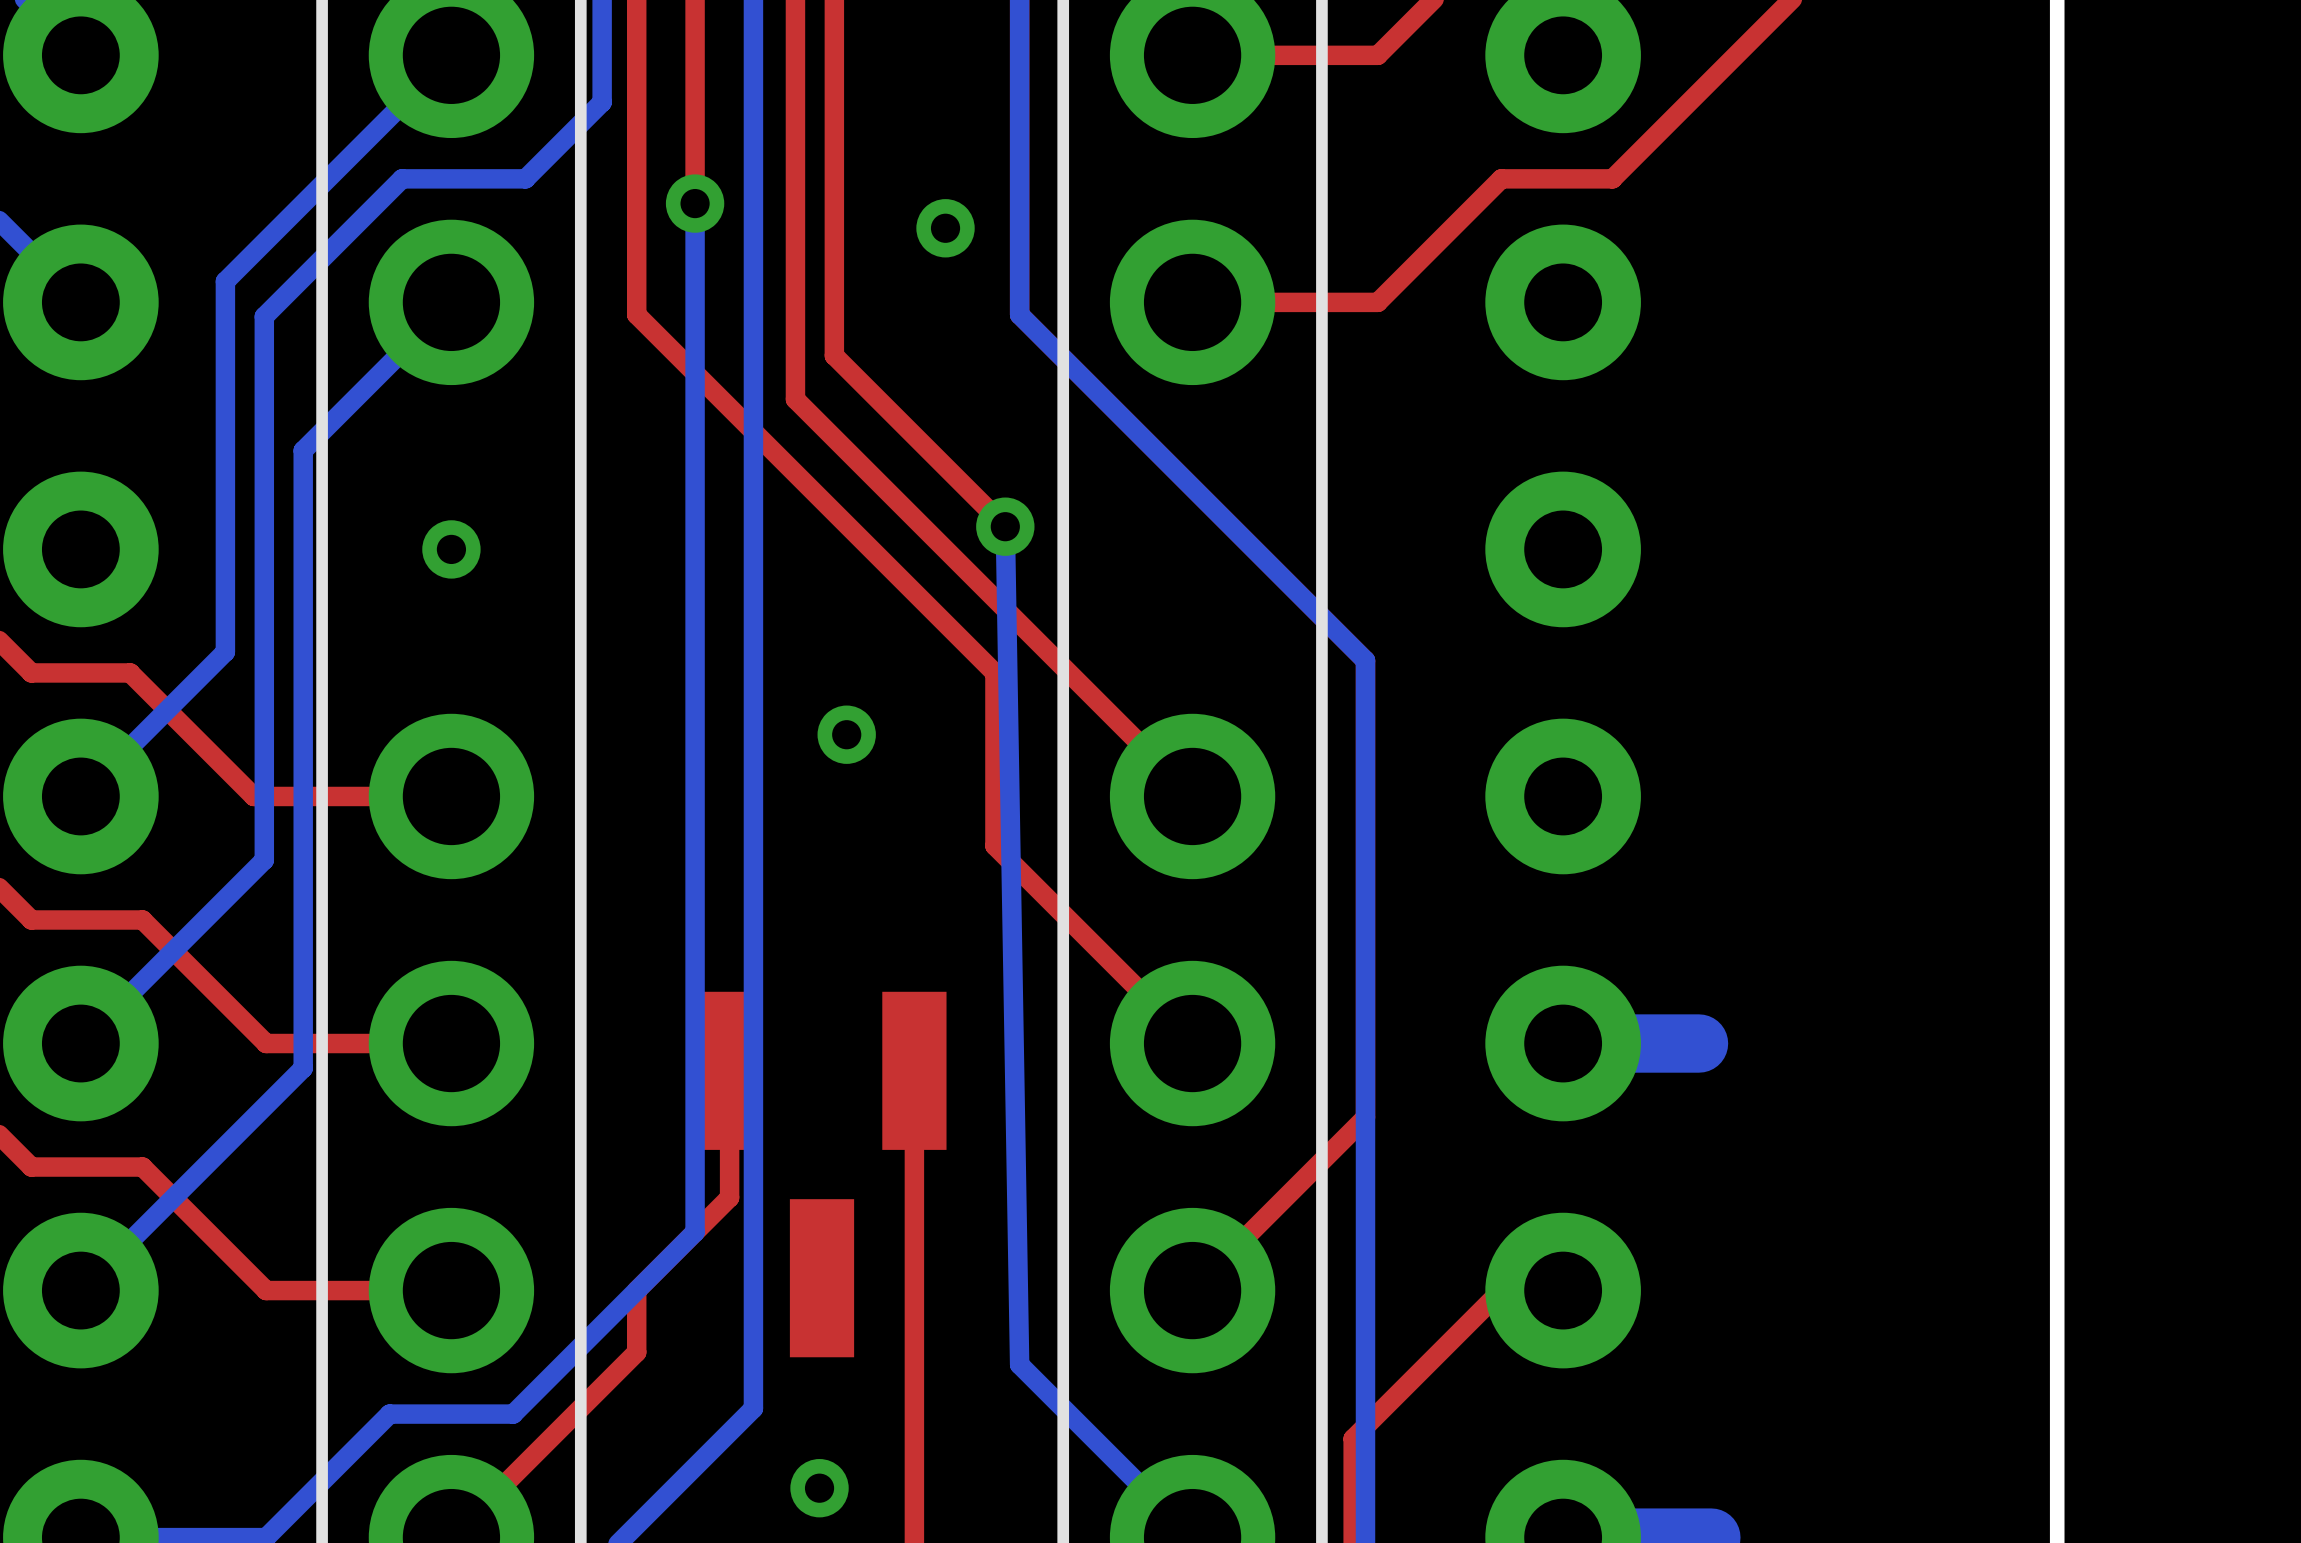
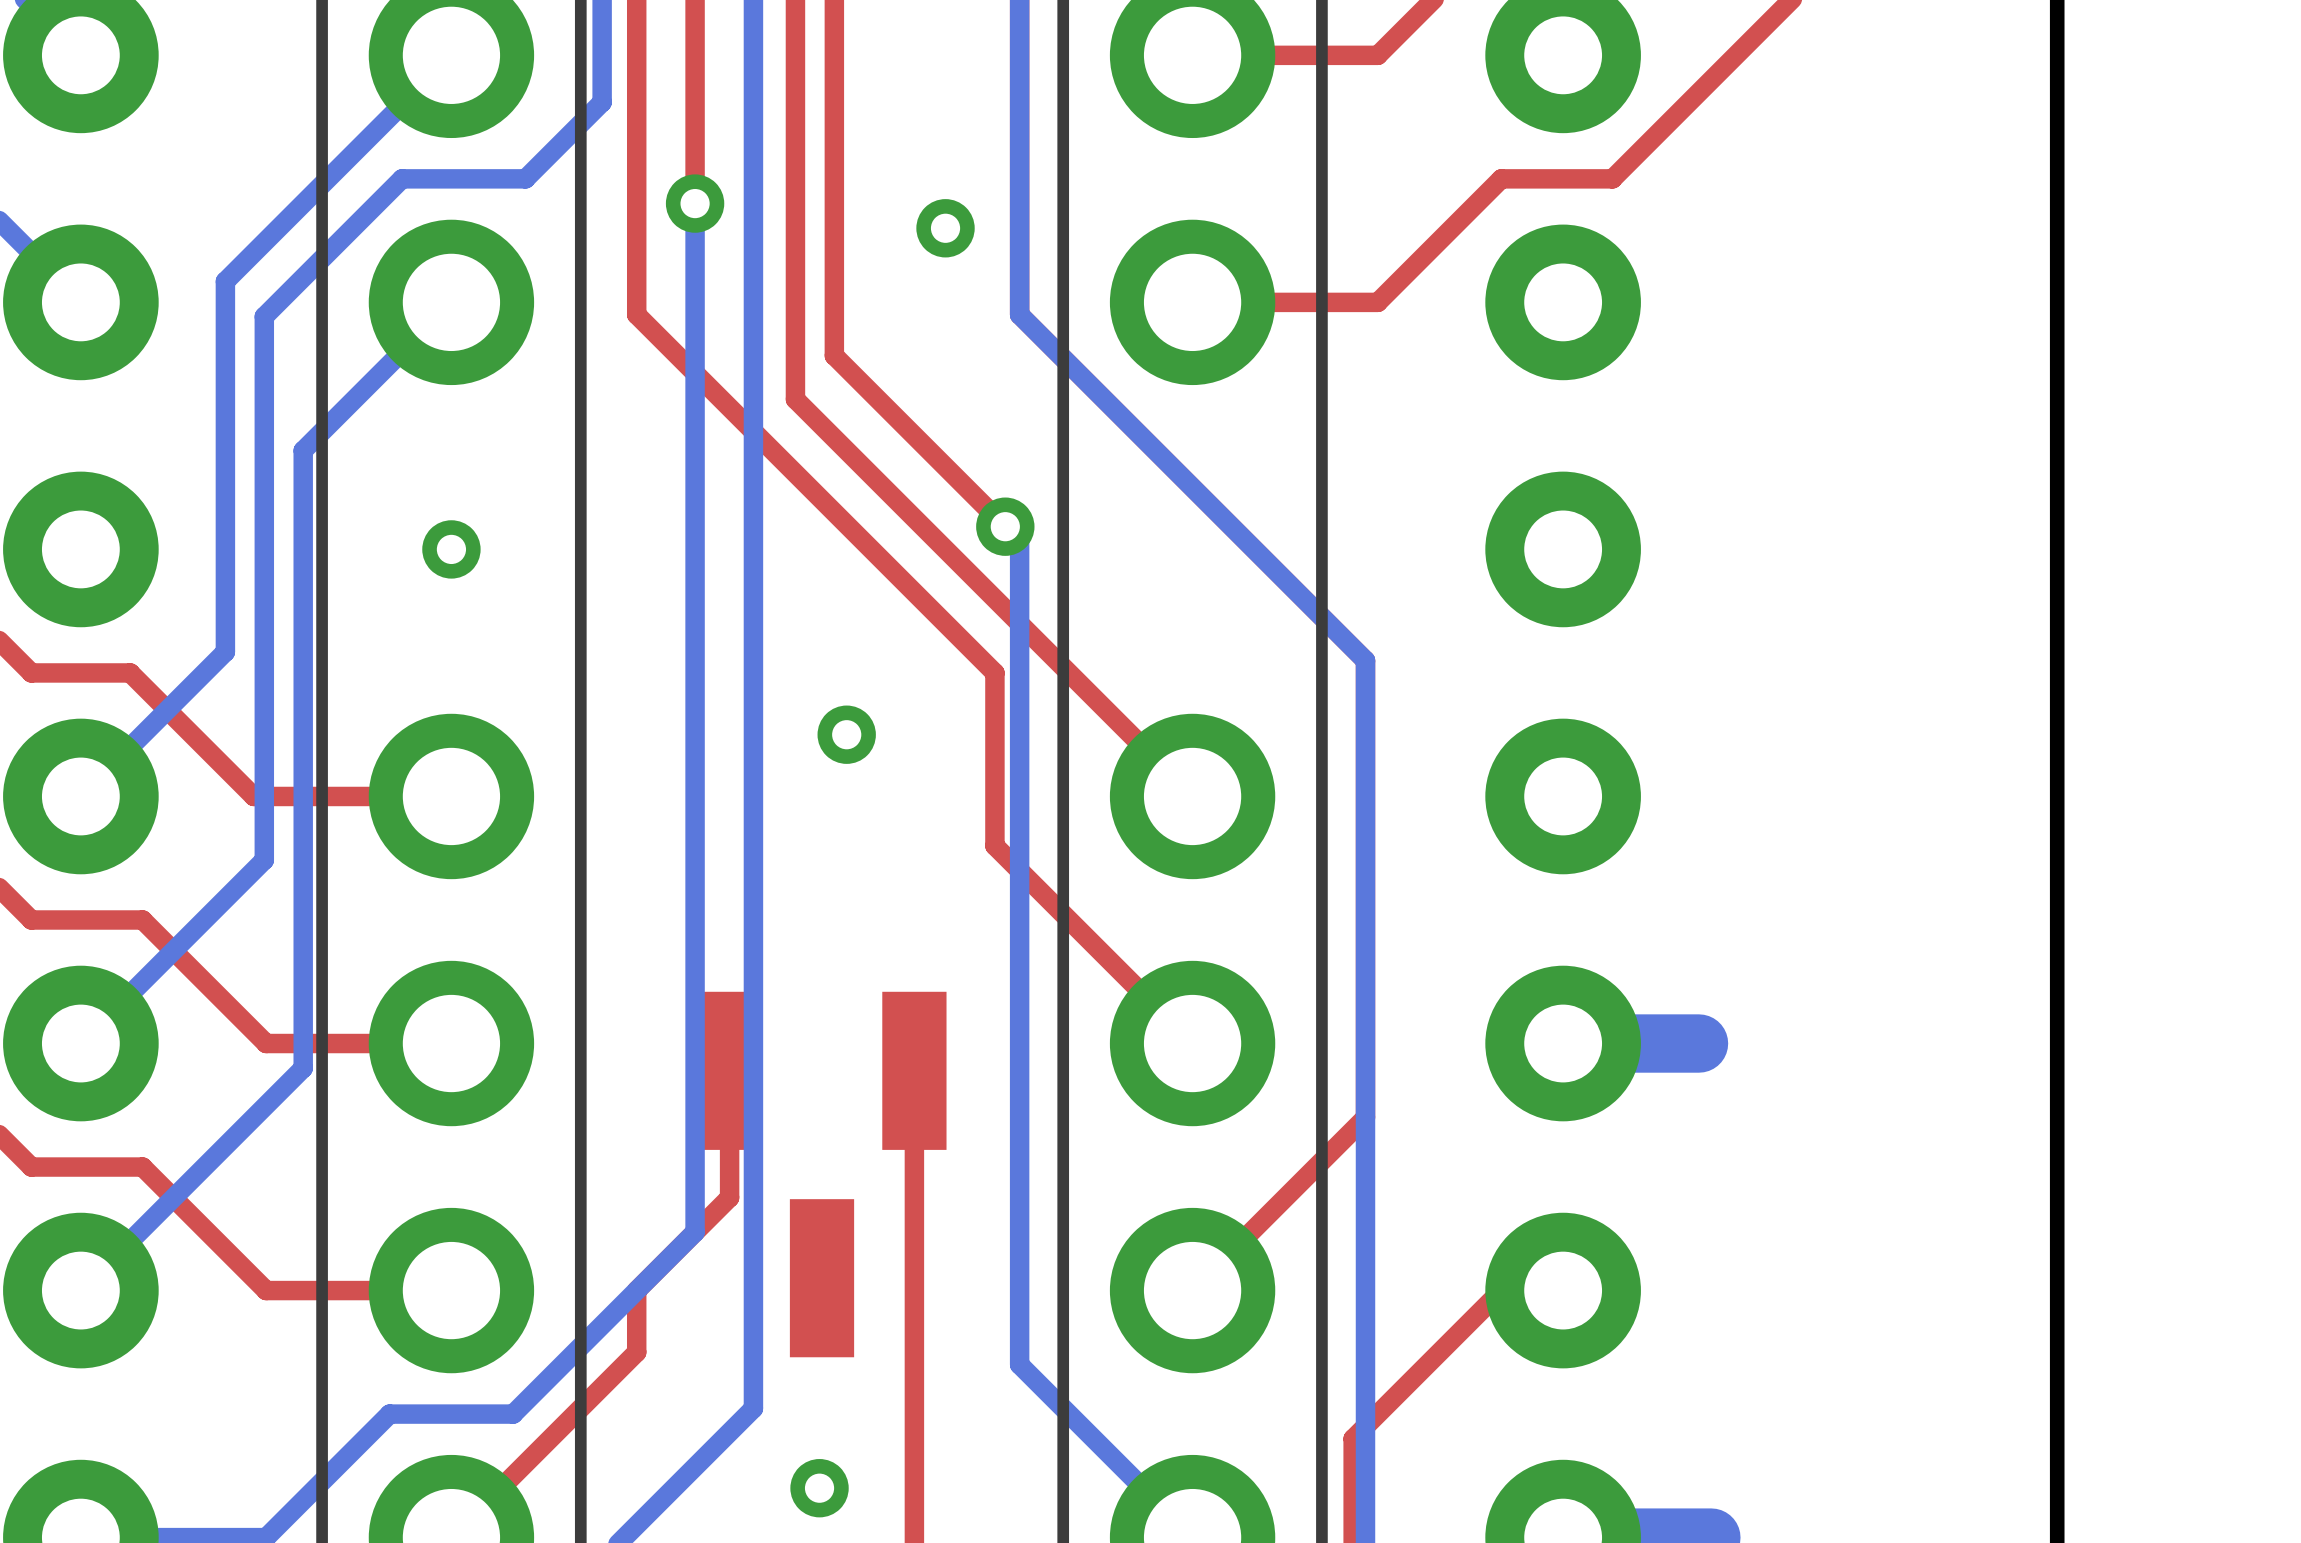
bottom track: (1005, 526) (1019, 1364) -> (1005, 526) (1019, 541) (1019, 1364)

